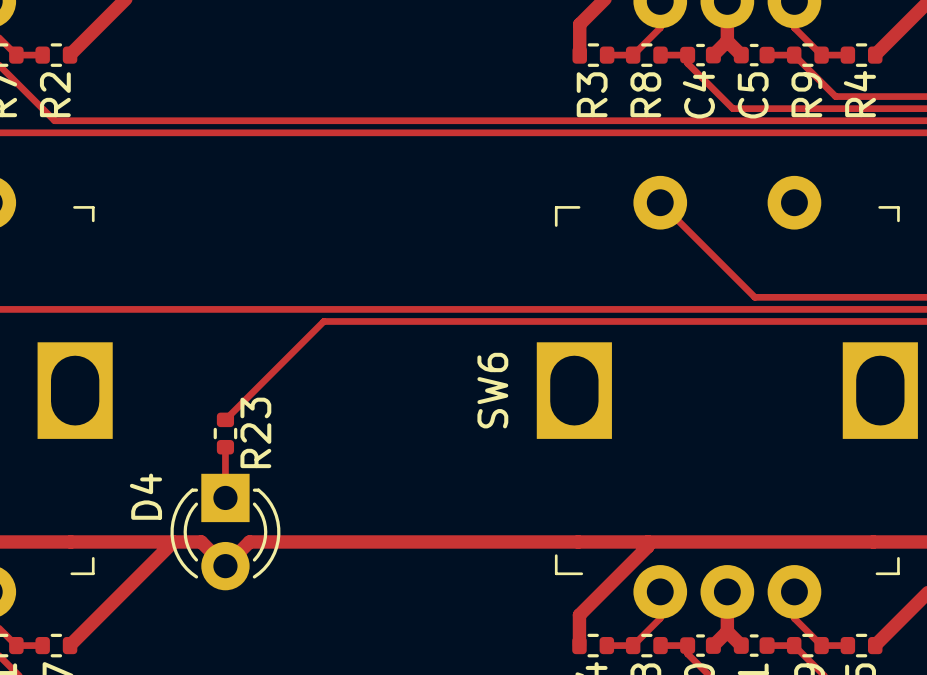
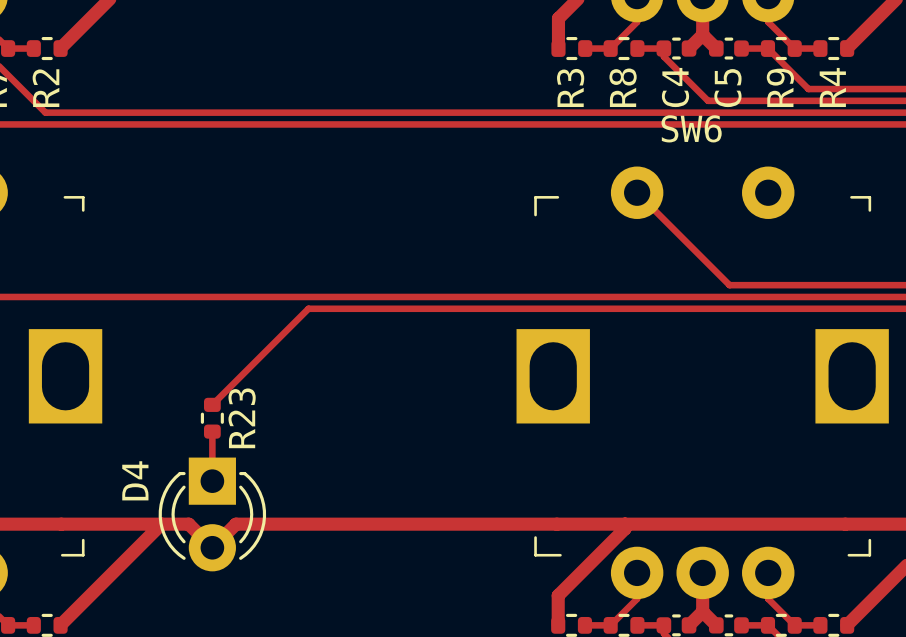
SW6 name rotation: 0° (492, 390) -> 90° clockwise (691, 128)
SW6 name position: SW6 (492, 390) -> SW6 (691, 128)

